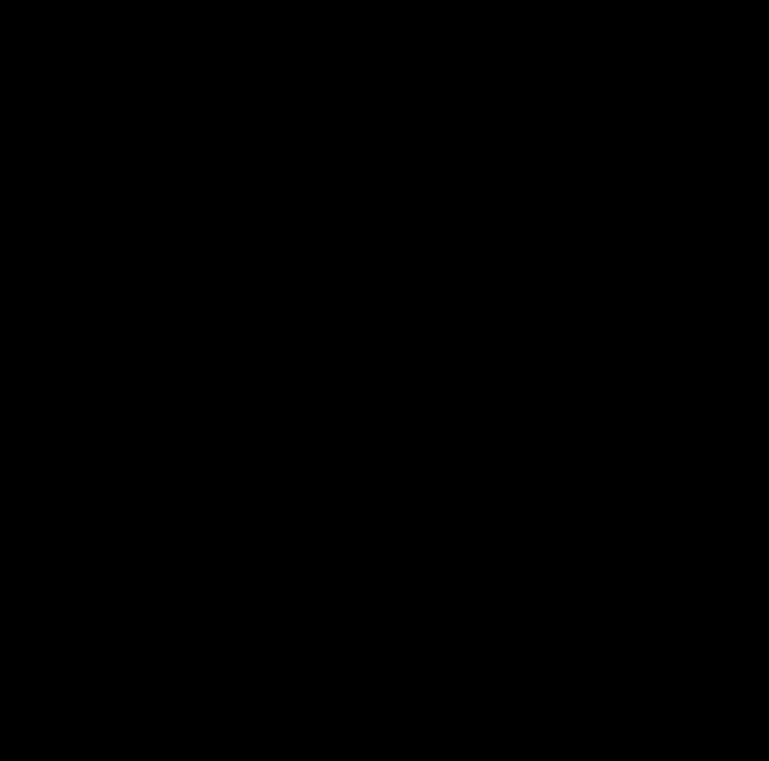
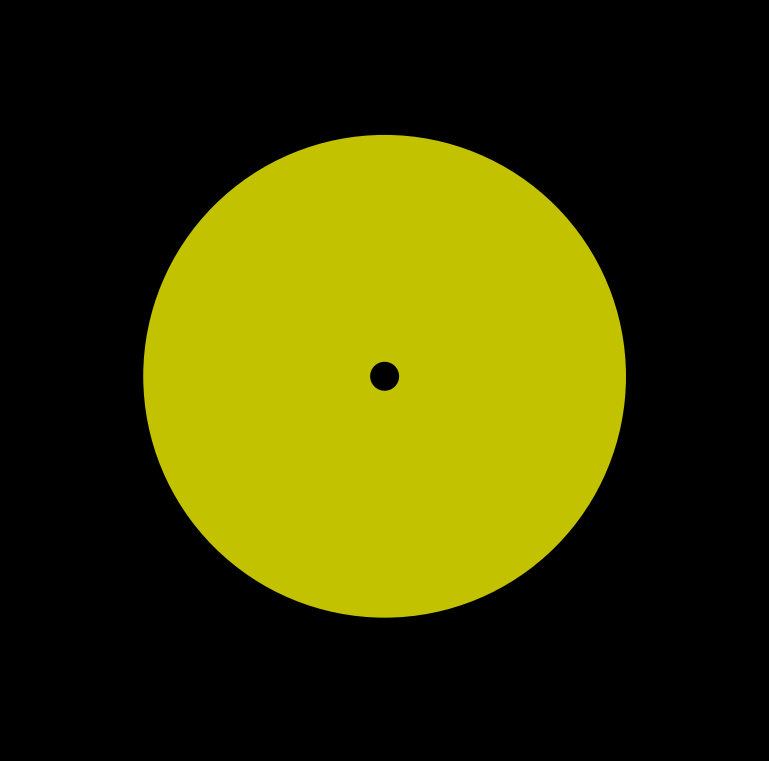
part: none -> (384, 376)

